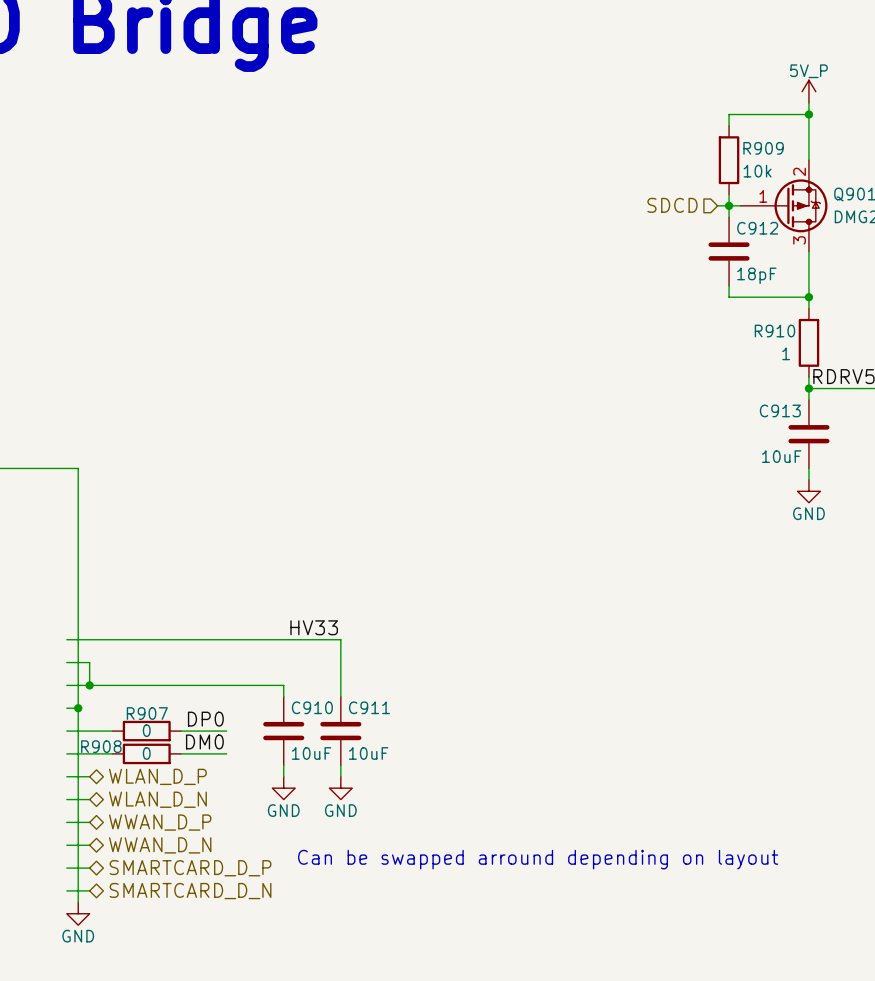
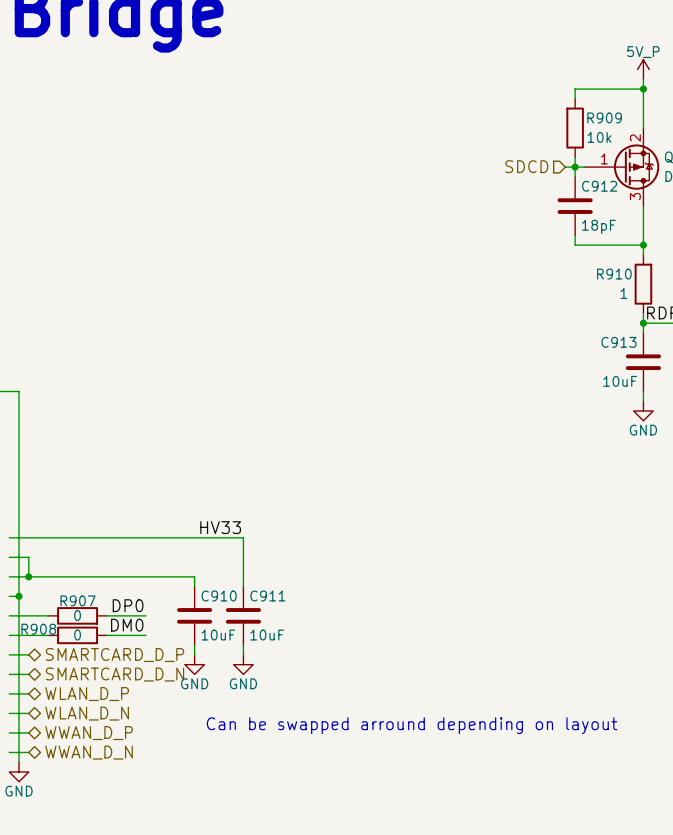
hierarchical label: WLAN_D_P (157, 776) -> SMARTCARD_D_P (114, 655)
hierarchical label: WLAN_D_N (157, 799) -> SMARTCARD_D_N (114, 674)
hierarchical label: WWAN_D_P (160, 822) -> WLAN_D_P (87, 694)
hierarchical label: WWAN_D_N (160, 845) -> WLAN_D_N (87, 713)
hierarchical label: SMARTCARD_D_P (190, 868) -> WWAN_D_P (89, 733)
hierarchical label: SMARTCARD_D_N (190, 891) -> WWAN_D_N (89, 752)

